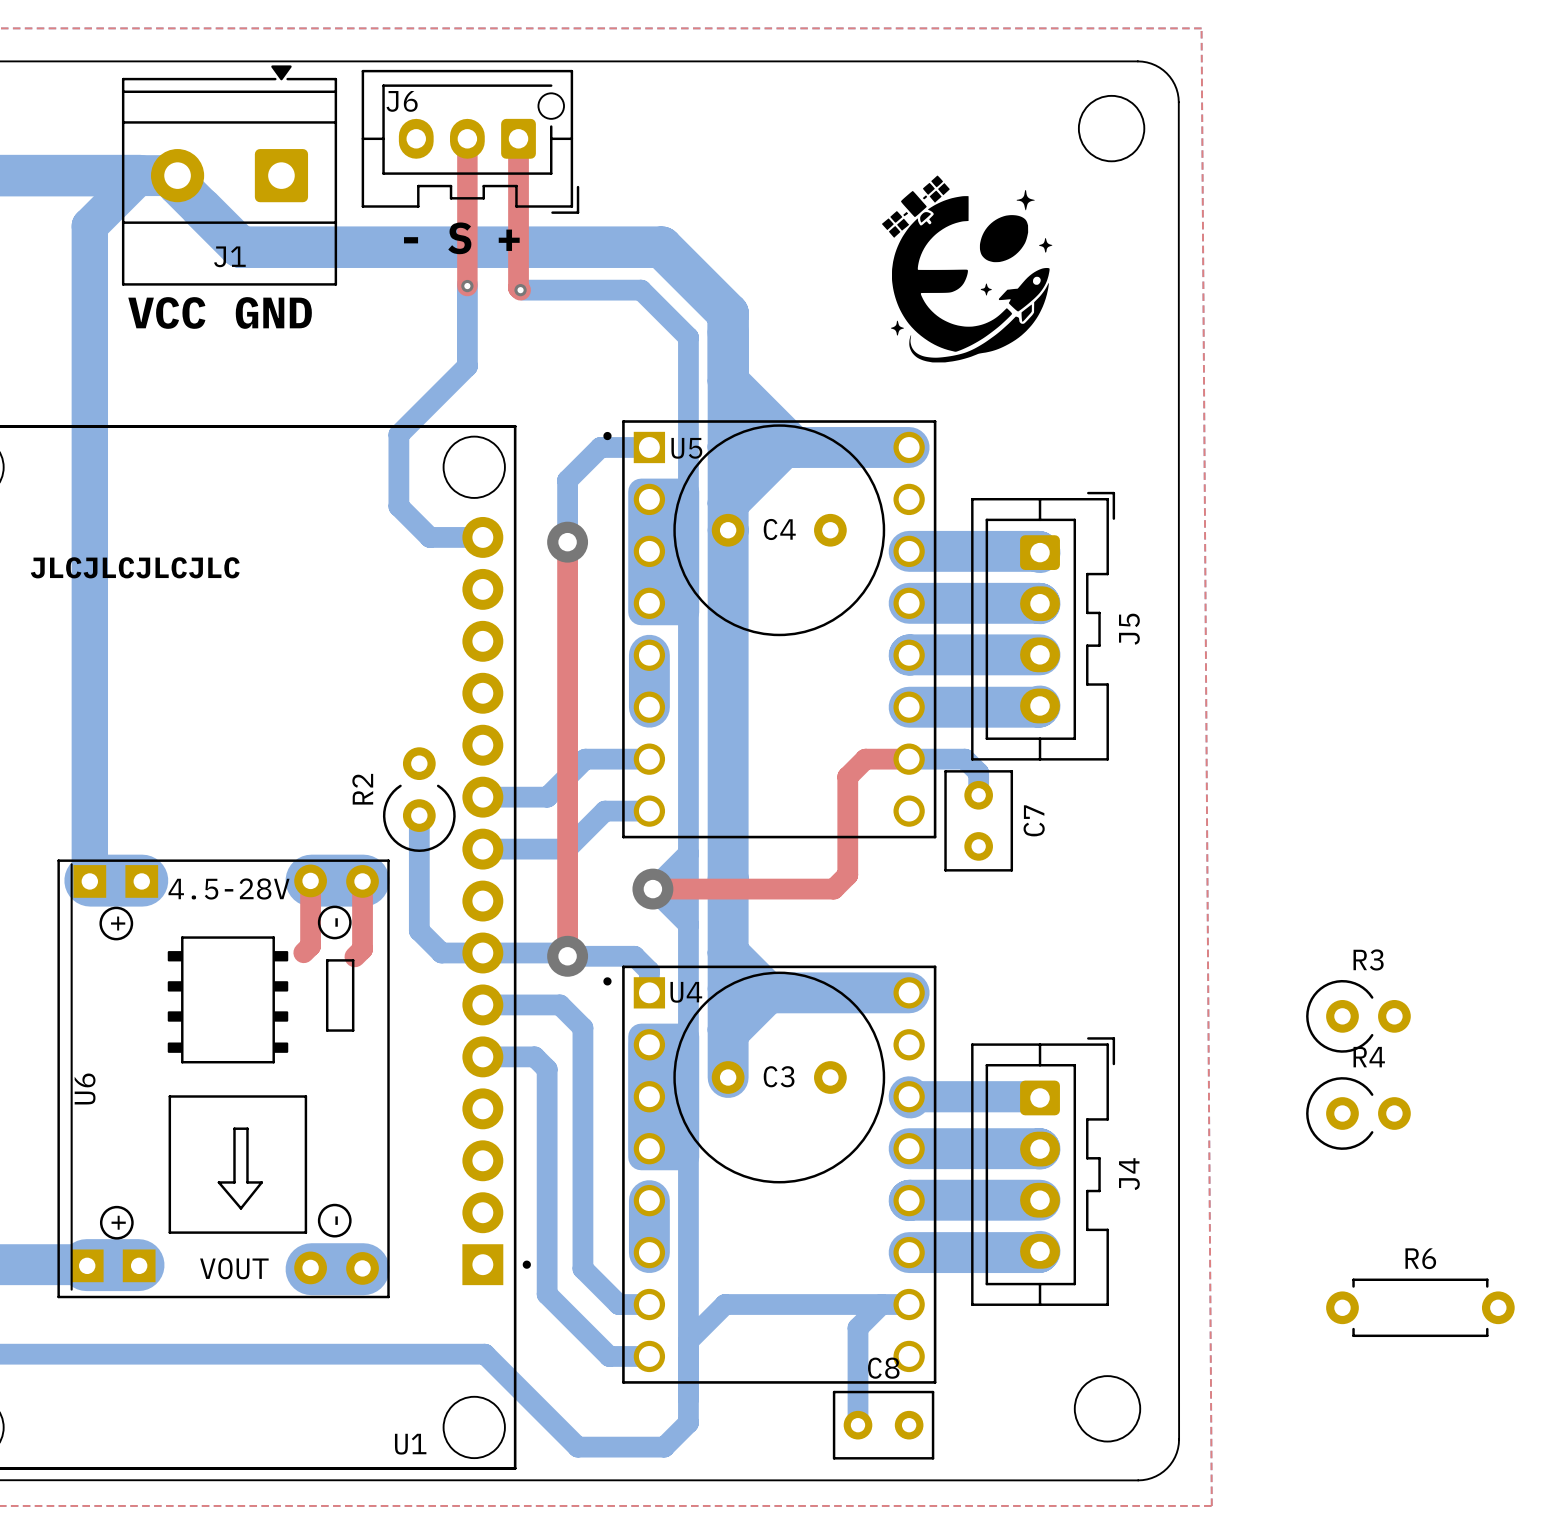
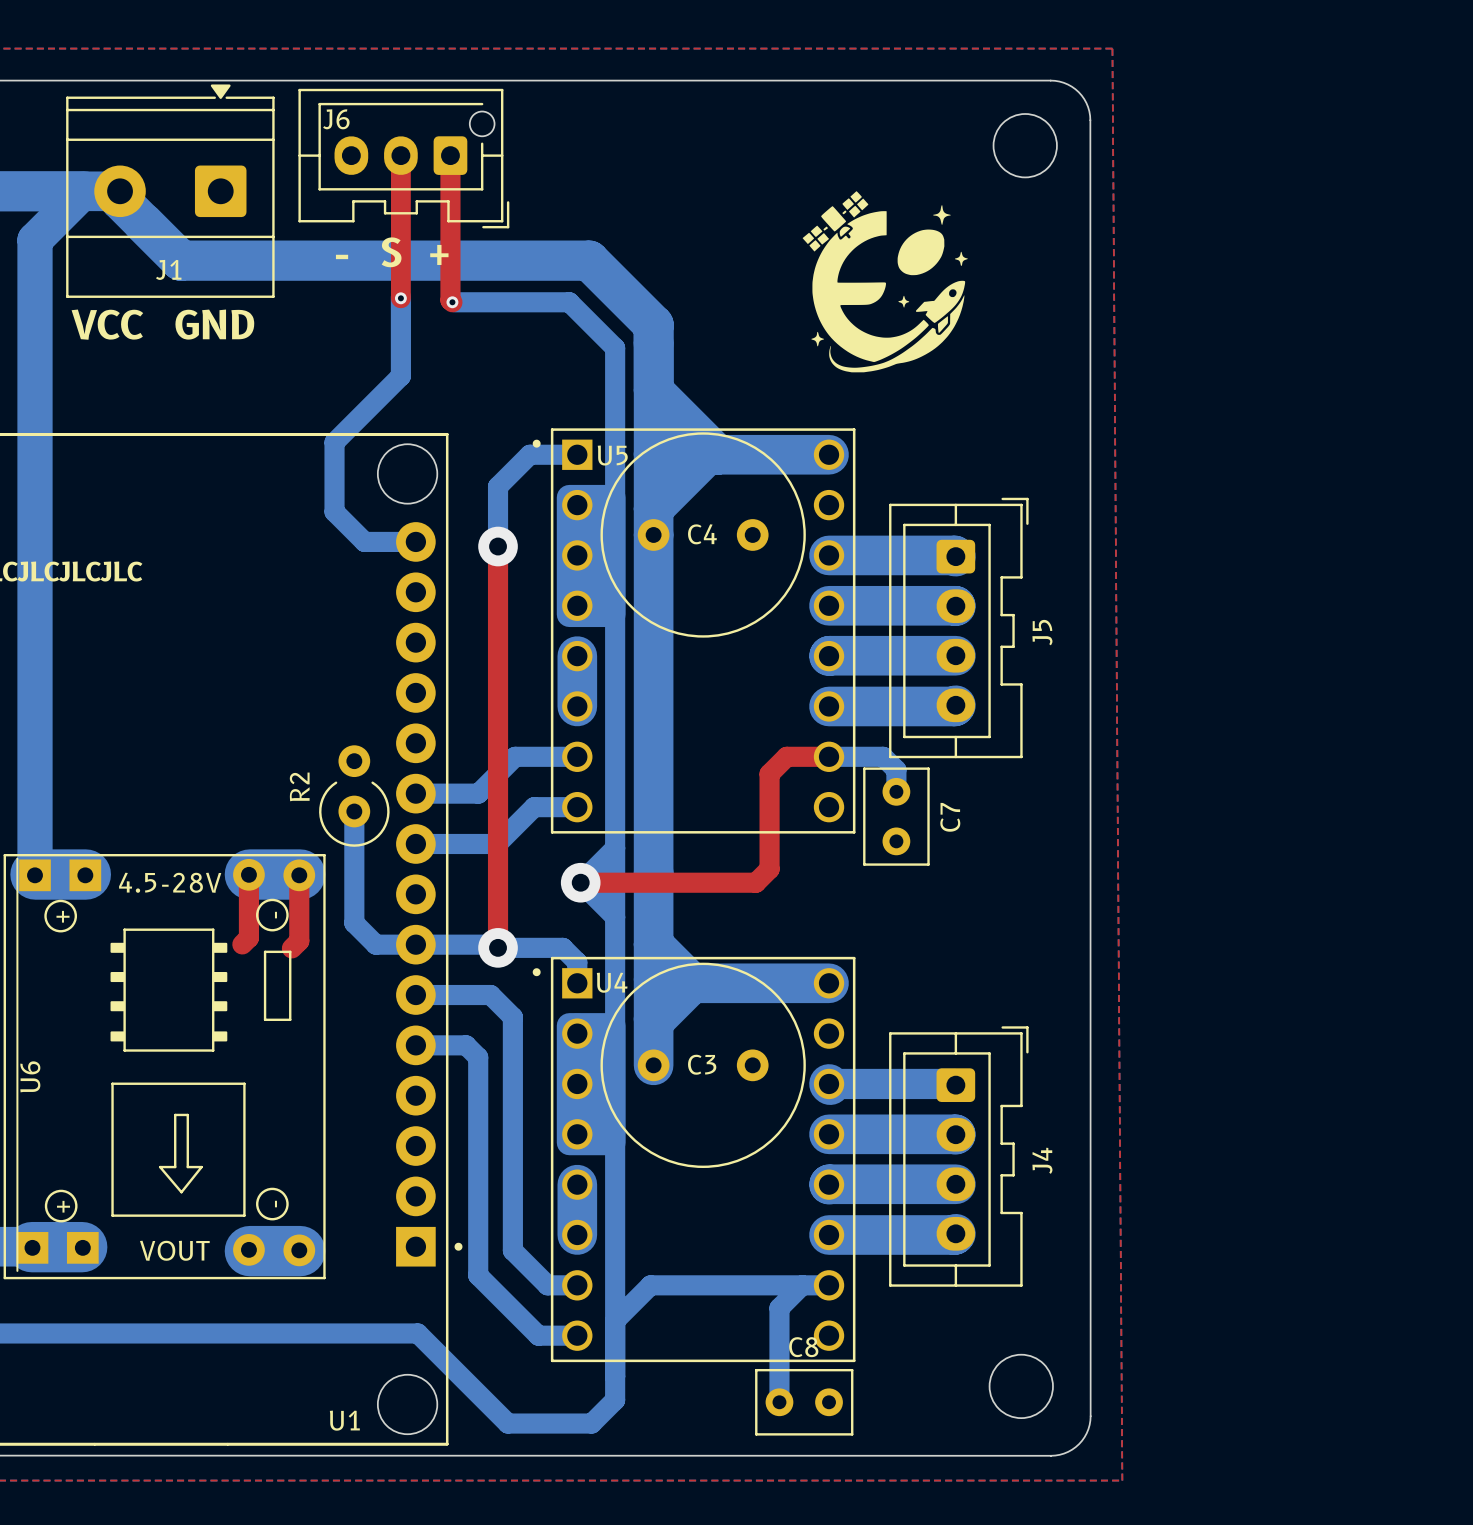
R3: (1358, 1016) -> none
R4: (1358, 1113) -> none
R6: (1420, 1307) -> none

